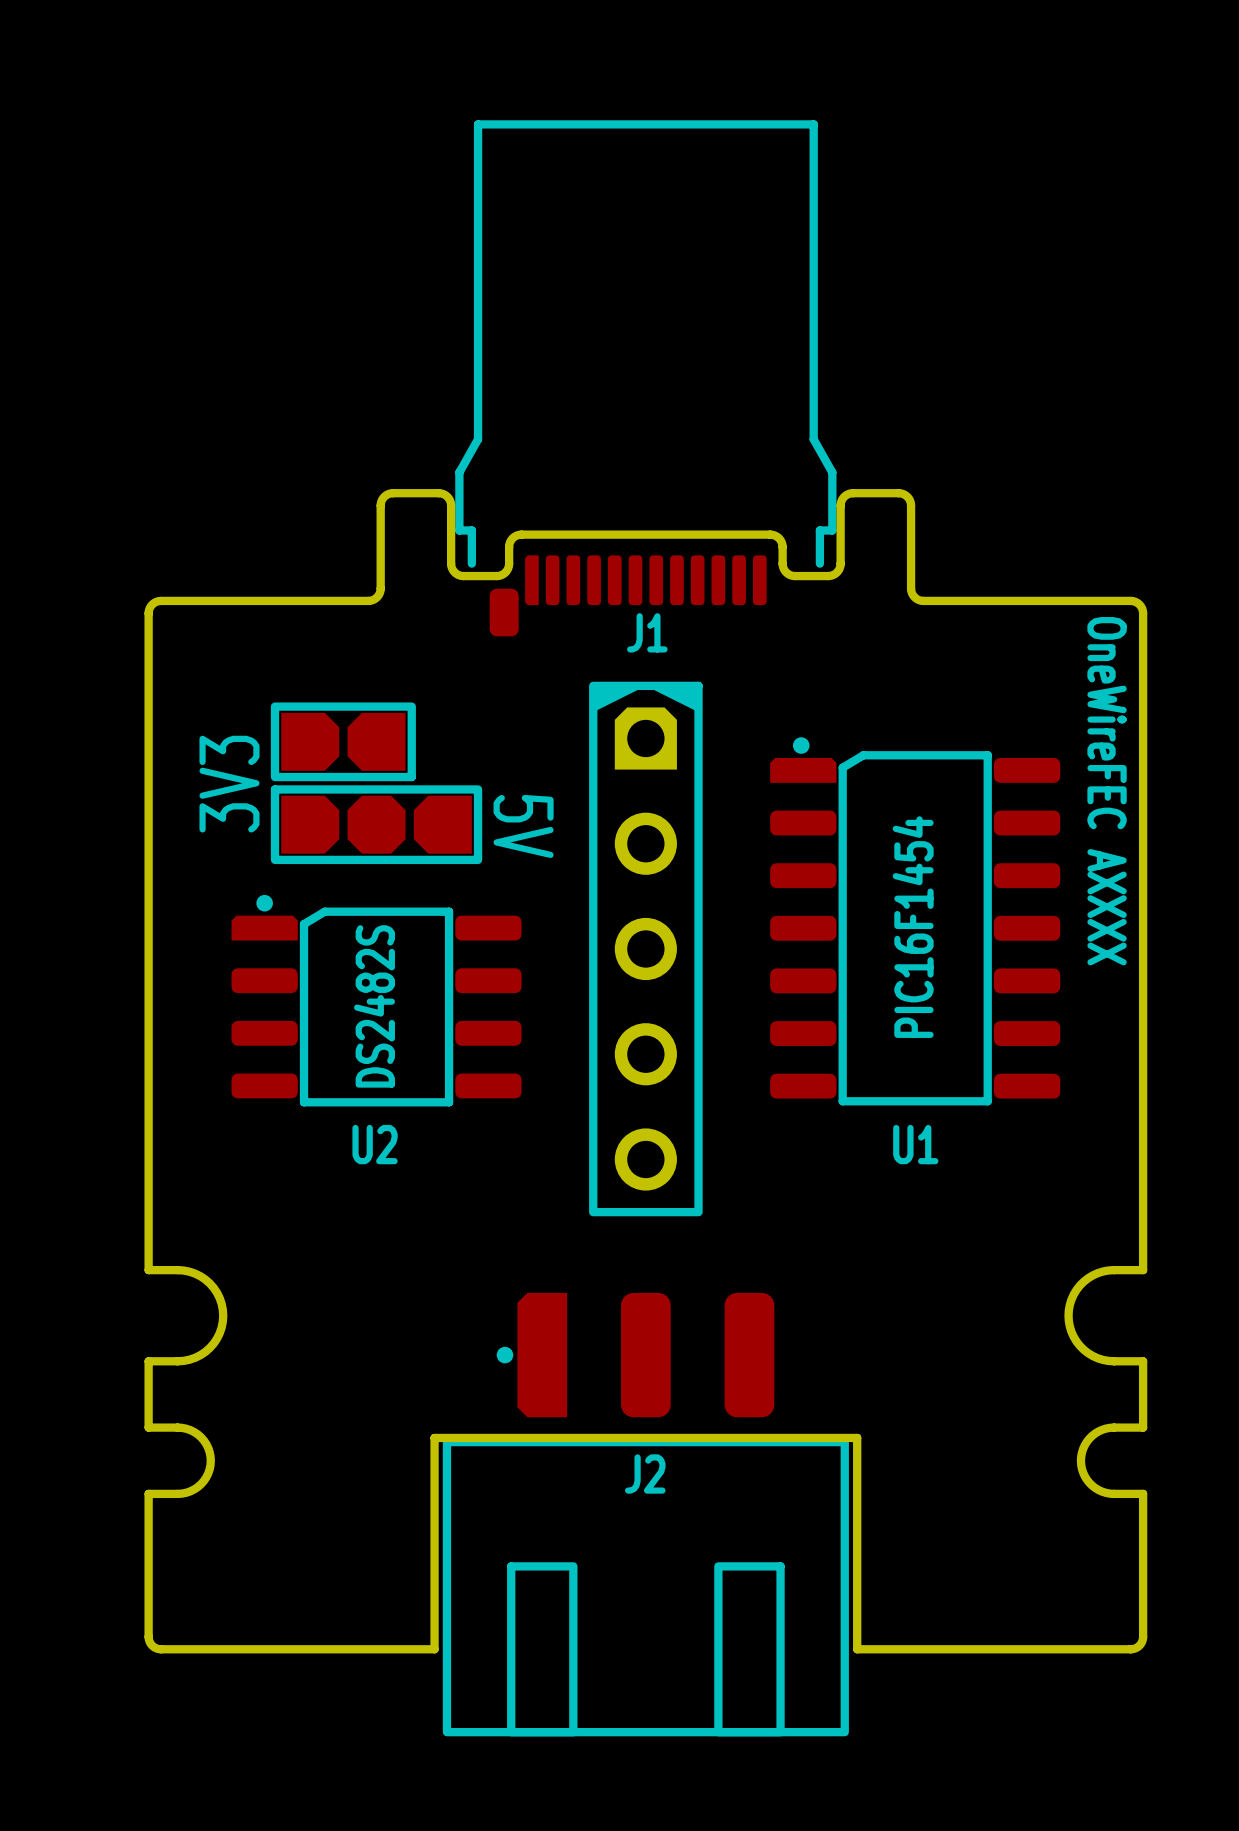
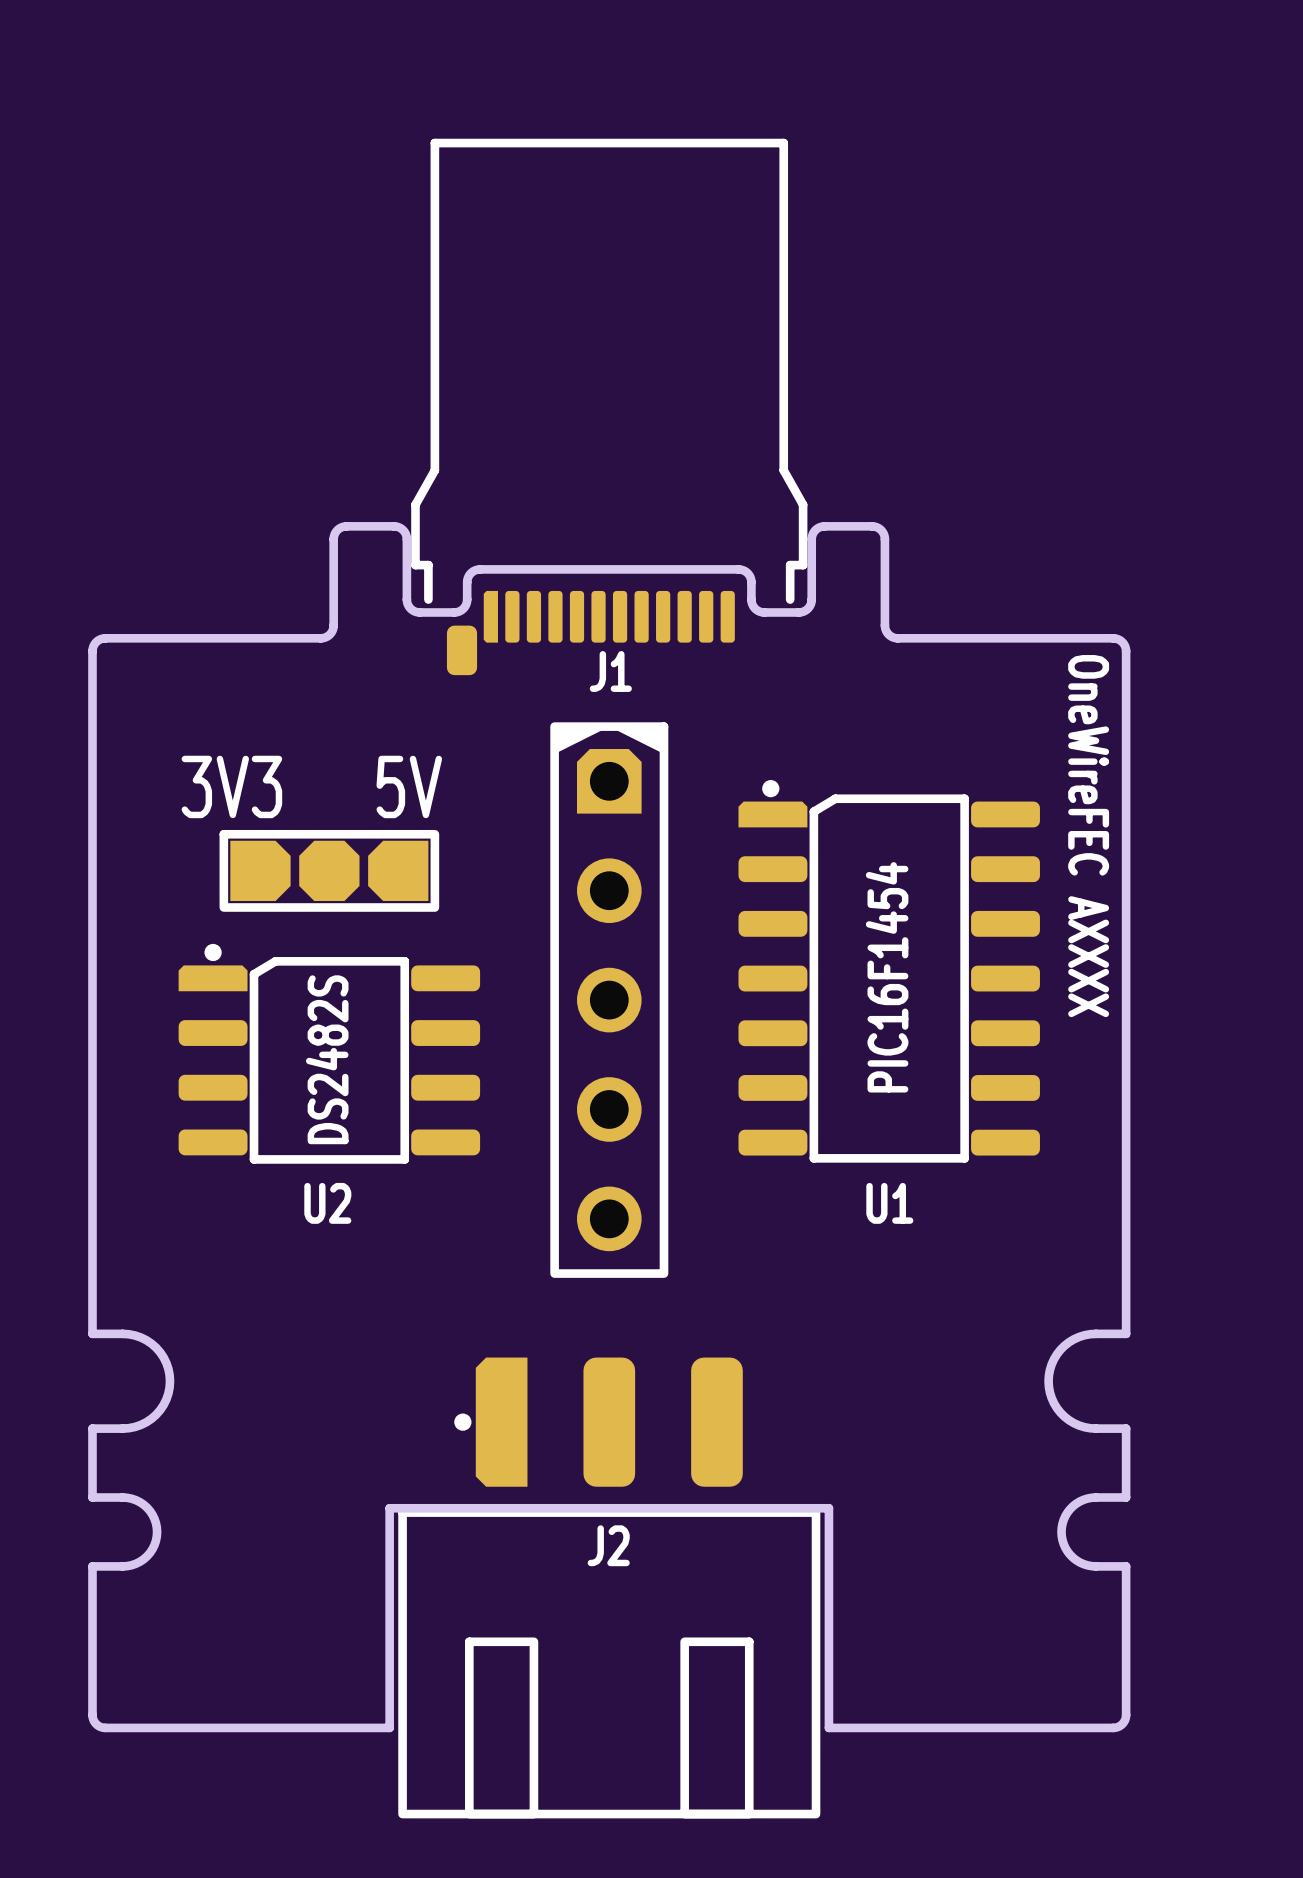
part: (343, 741) -> none
text rotation: 0° (229, 784) -> 90° clockwise (231, 786)
text rotation: 0° (523, 826) -> 90° counterclockwise (409, 786)

